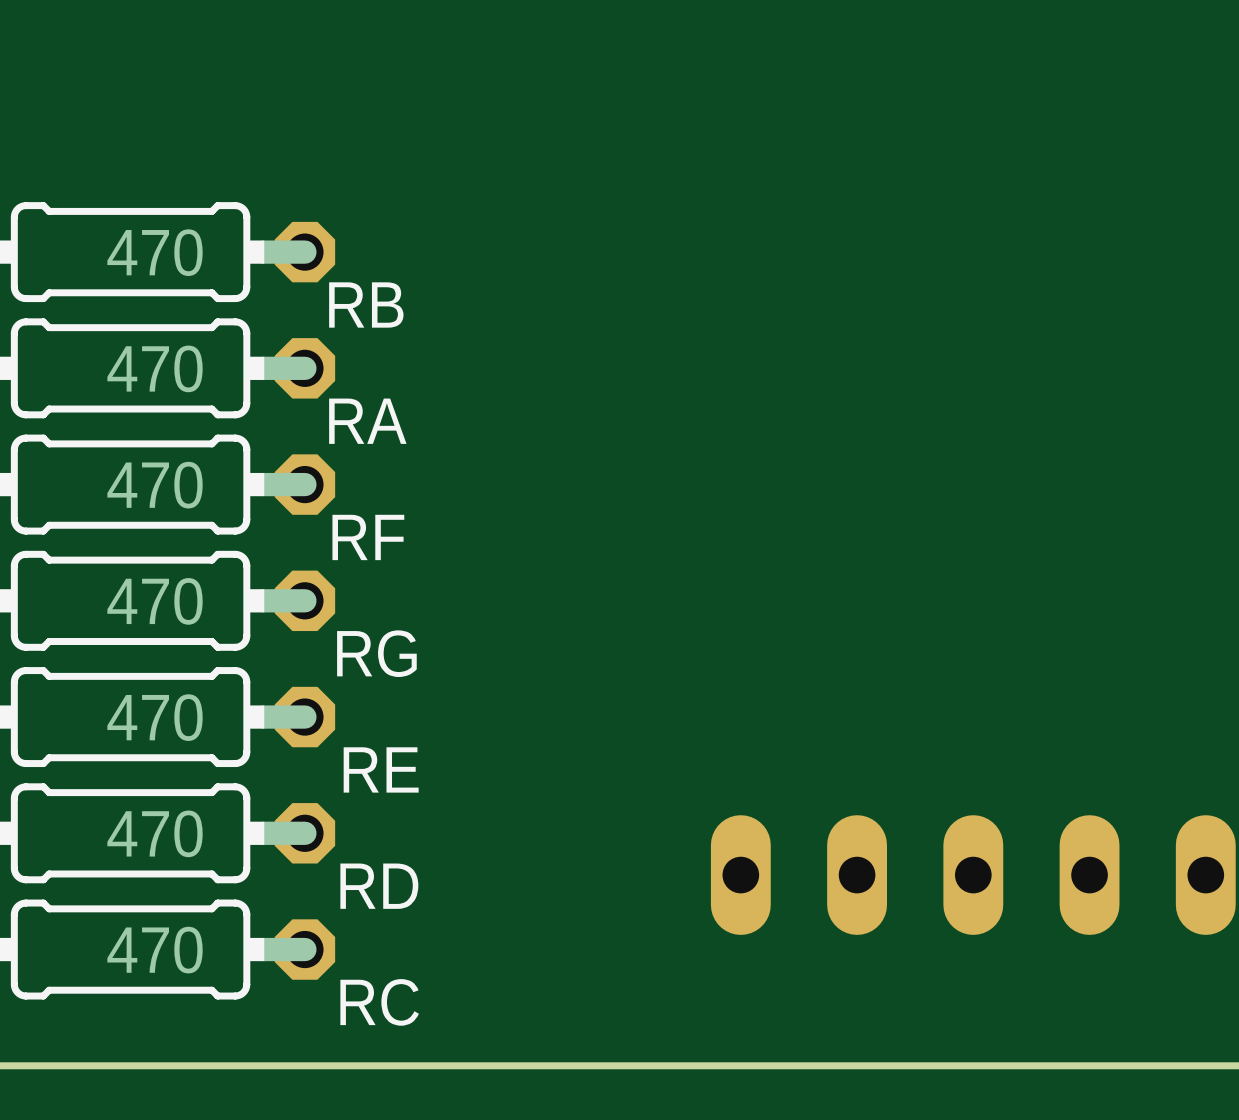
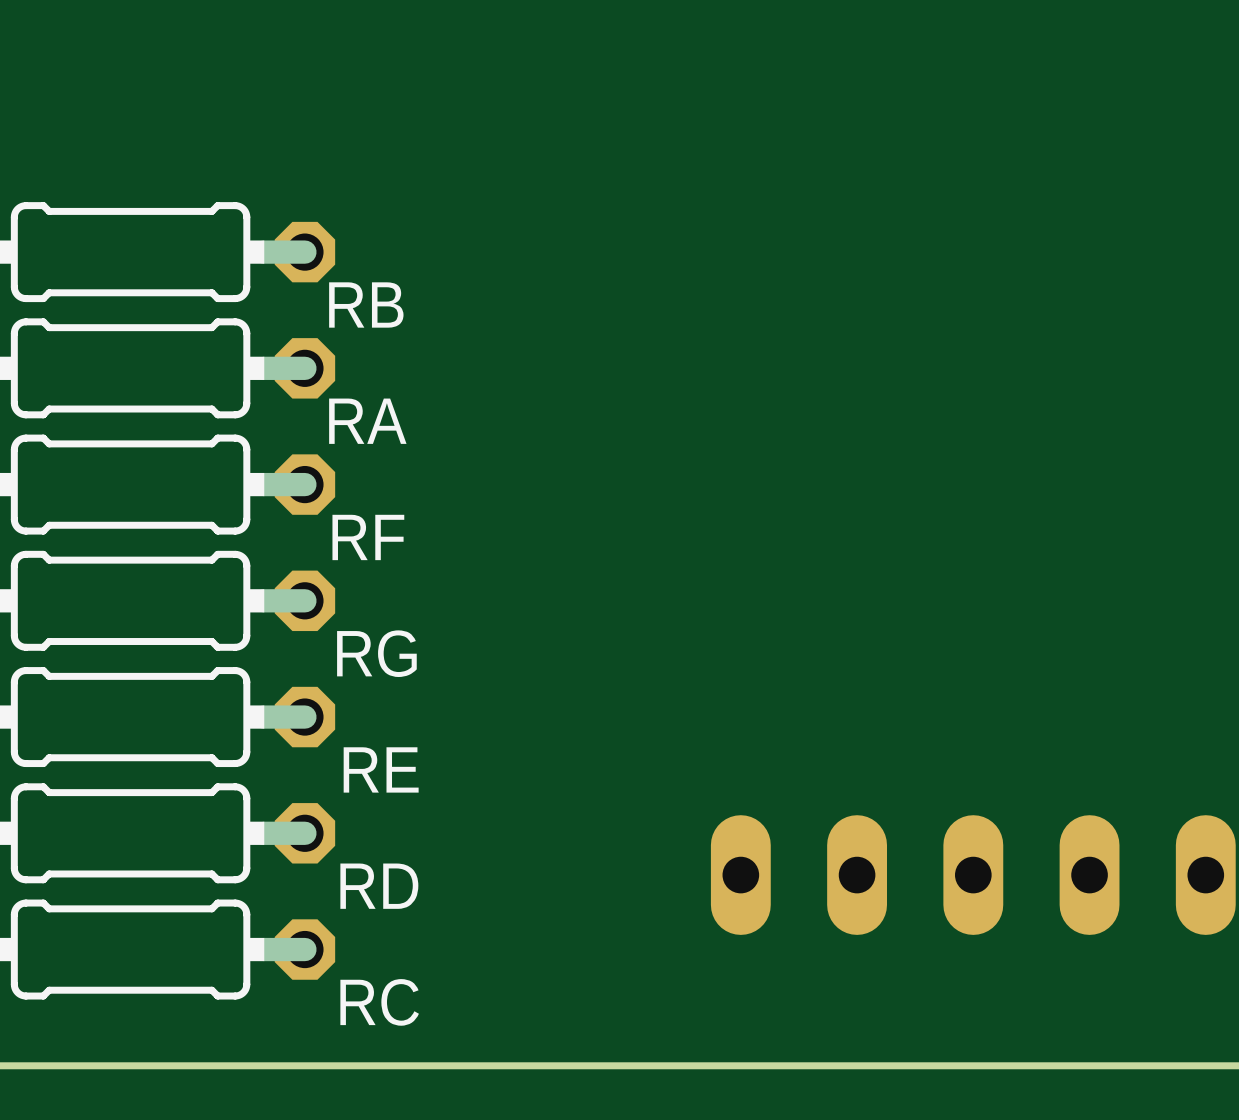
RB value: 470 (155, 252) -> none
RA value: 470 (155, 368) -> none
RF value: 470 (155, 485) -> none
RG value: 470 (155, 601) -> none
RE value: 470 (155, 717) -> none
RD value: 470 (155, 833) -> none
RC value: 470 (155, 950) -> none

